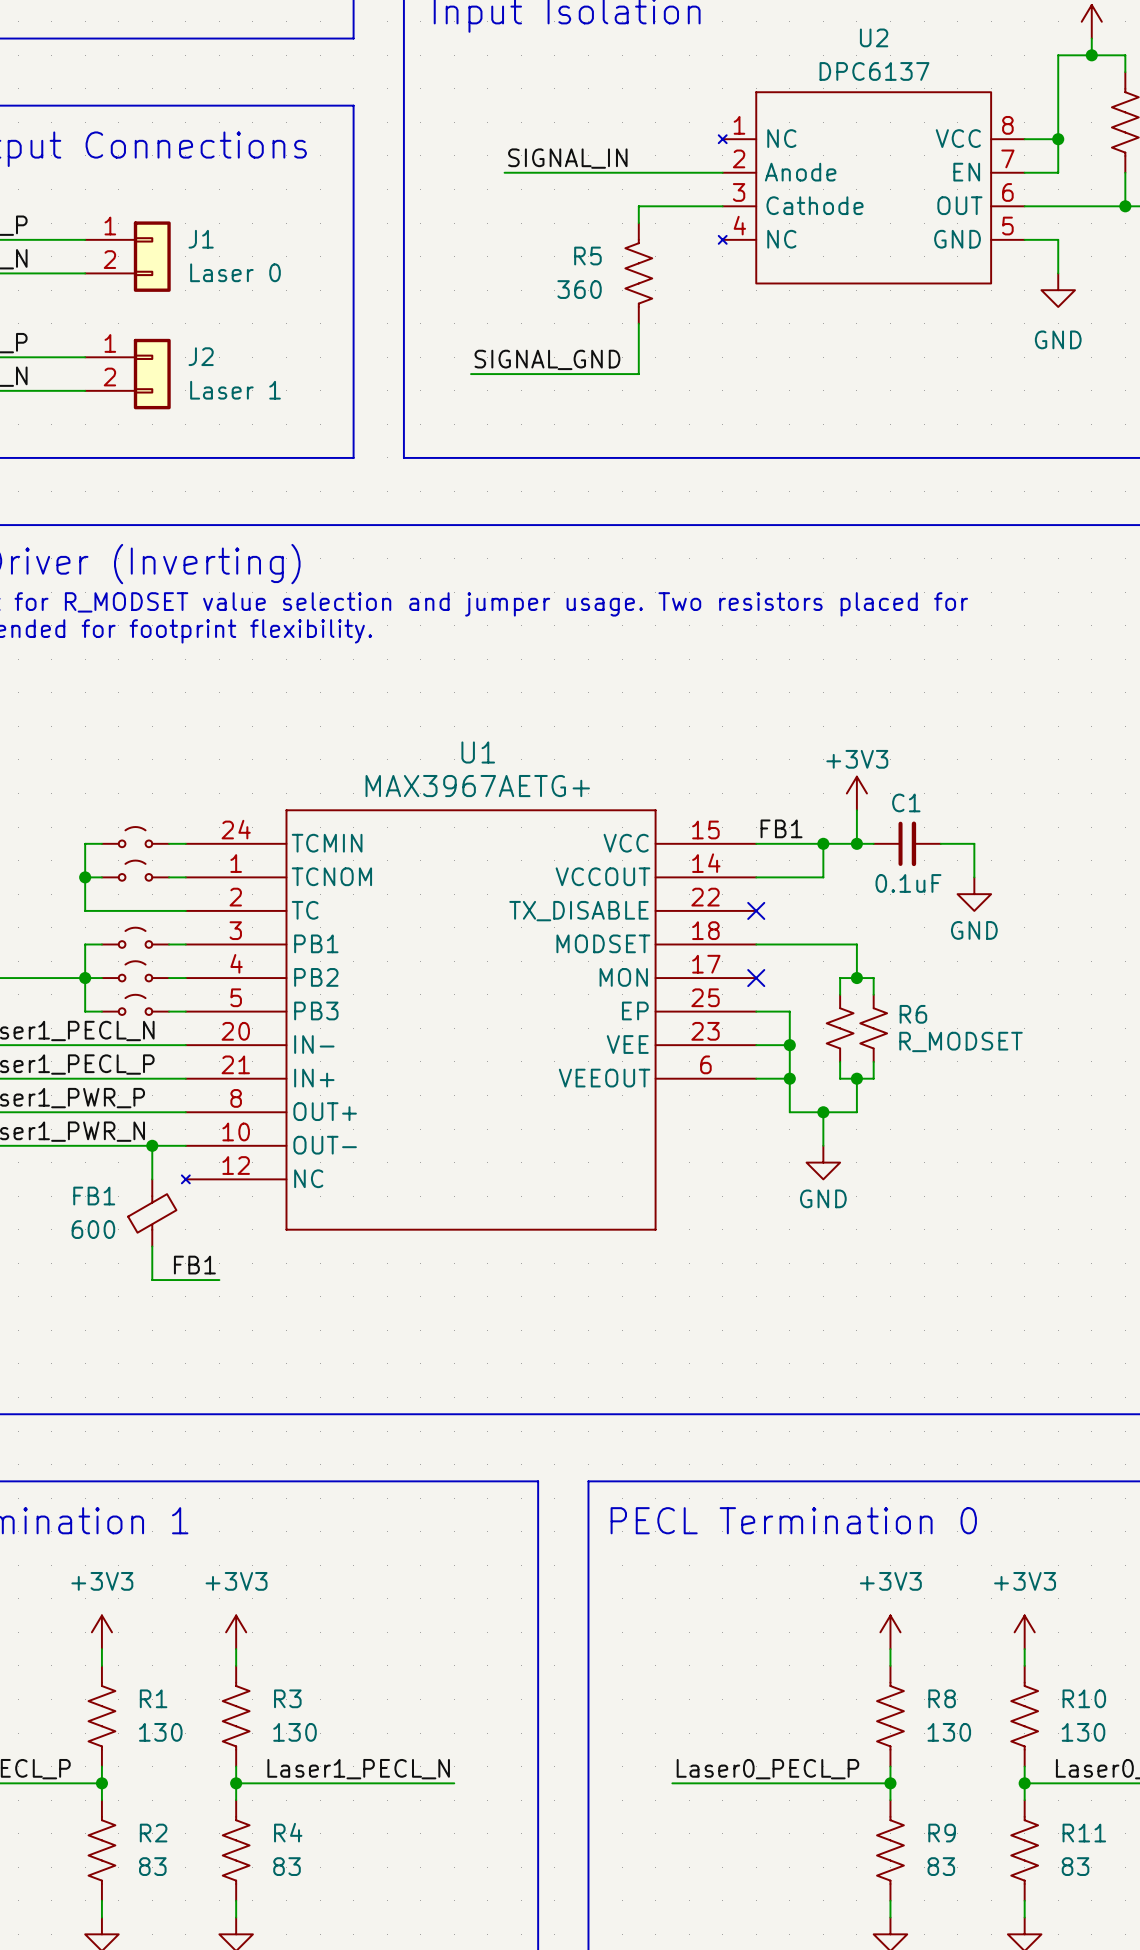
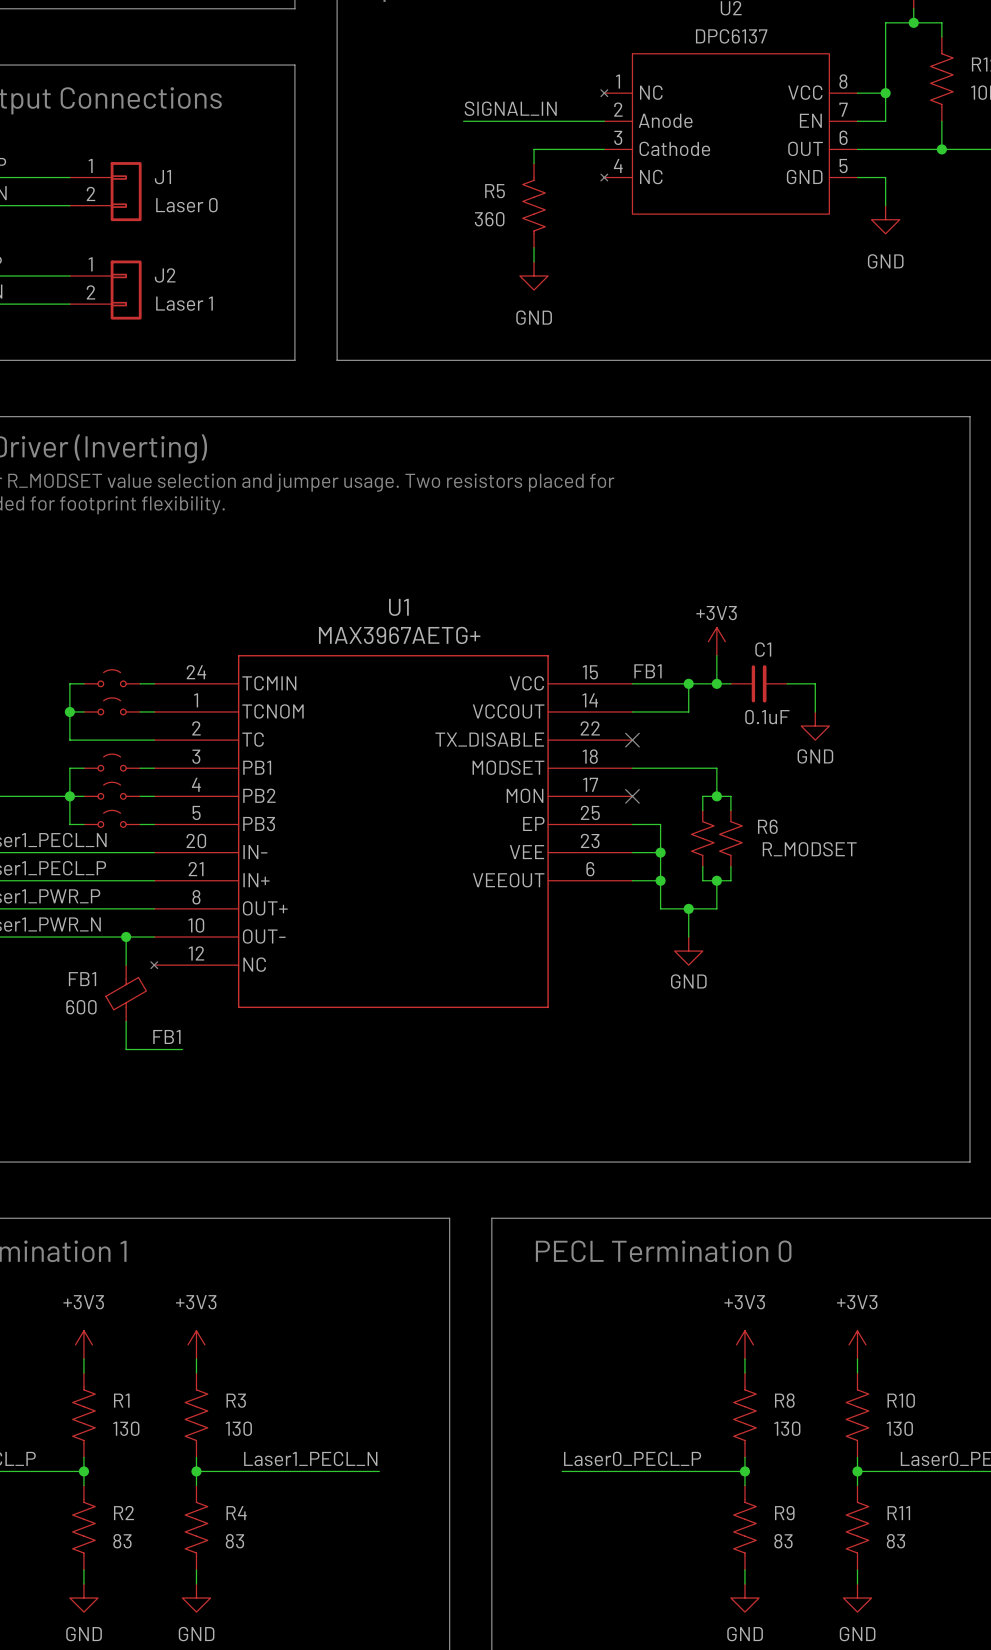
label position: SIGNAL_IN (567, 158) -> SIGNAL_IN (510, 108)
wire: (504, 172) (554, 172) -> none
wire: (638, 340) (638, 374) (471, 374) -> none
power symbol: none -> GND (534, 275)
label: SIGNAL_GND (547, 359) -> none

